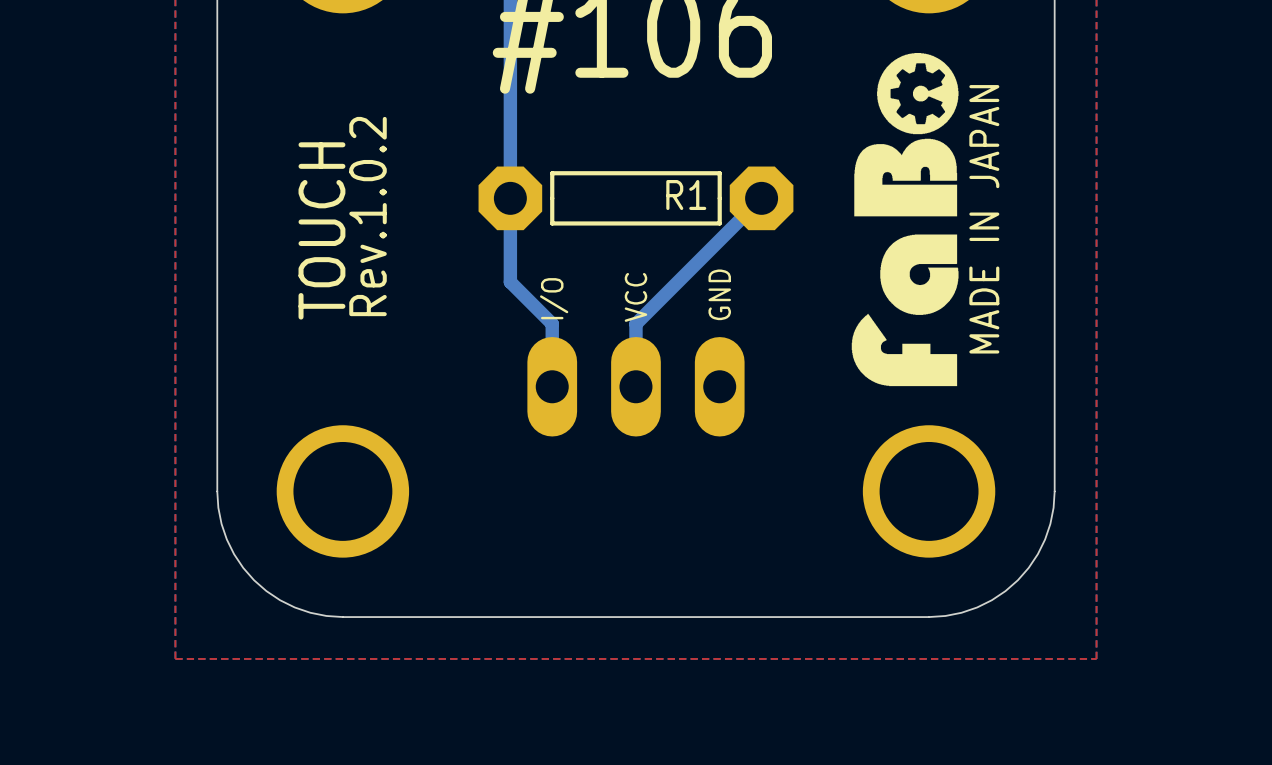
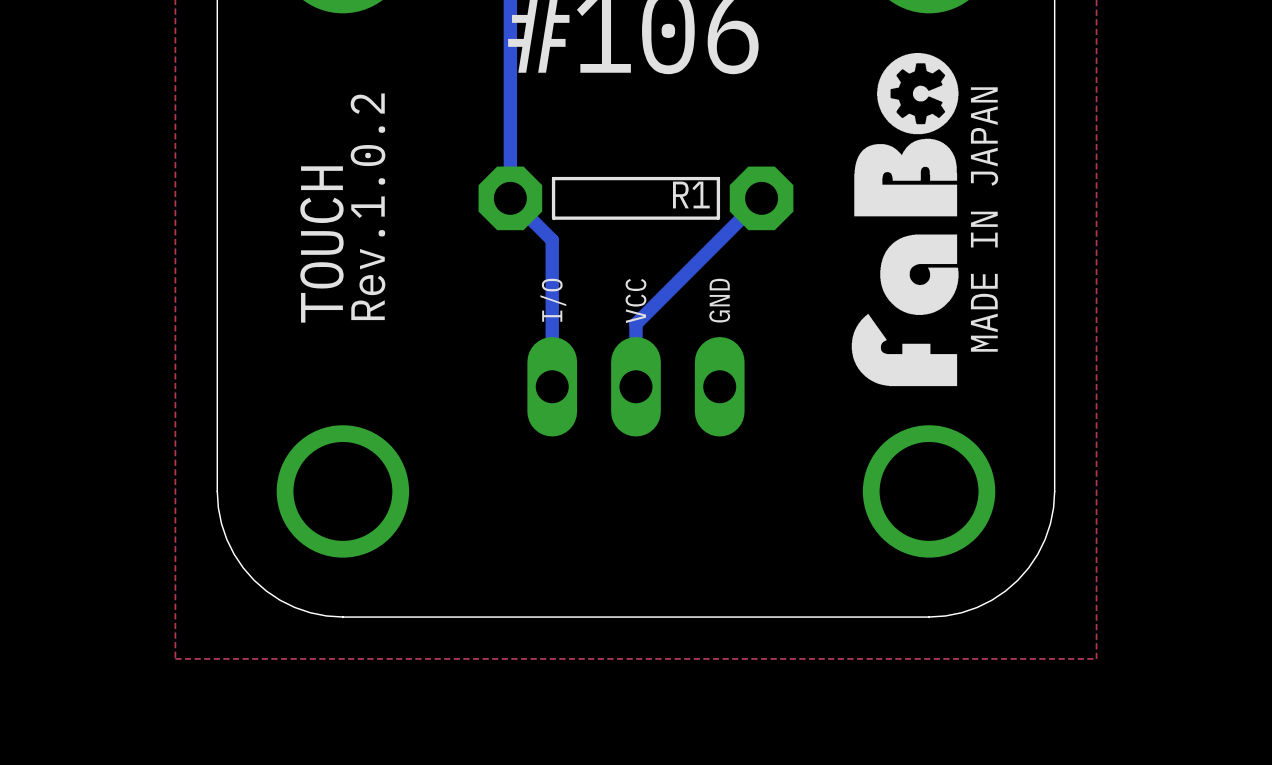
R1 footprint: [478, 166, 794, 231] -> [478, 166, 794, 231]
bottom track: (510, 198) (510, 282) (552, 323) -> (510, 198) (552, 240) (552, 323)

